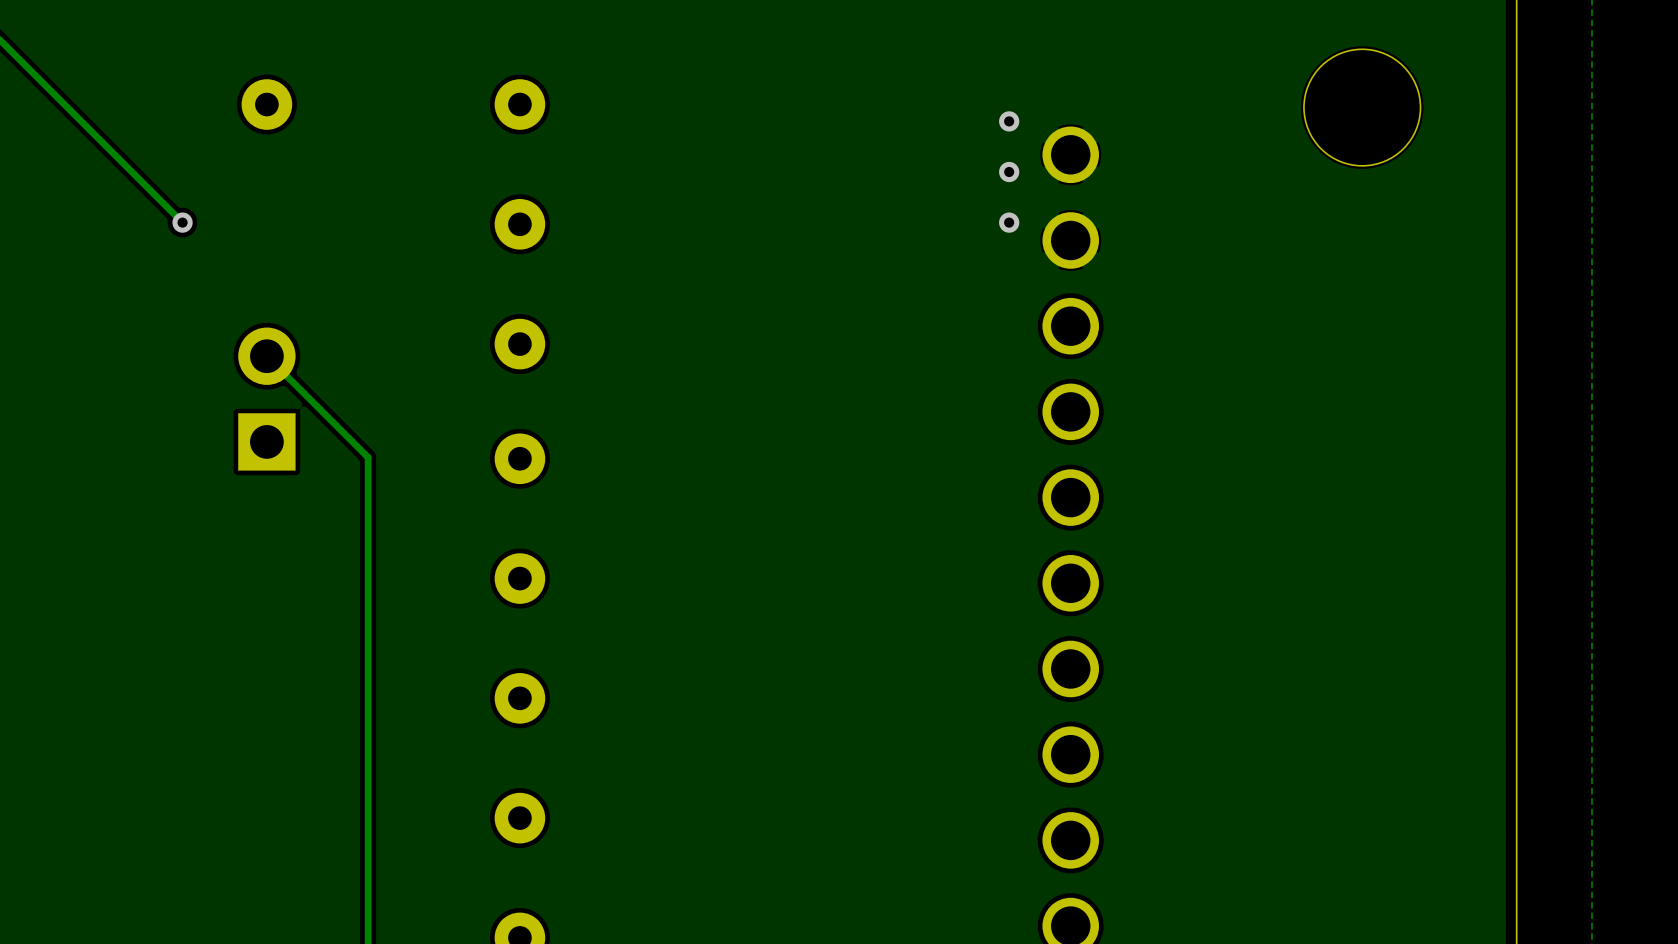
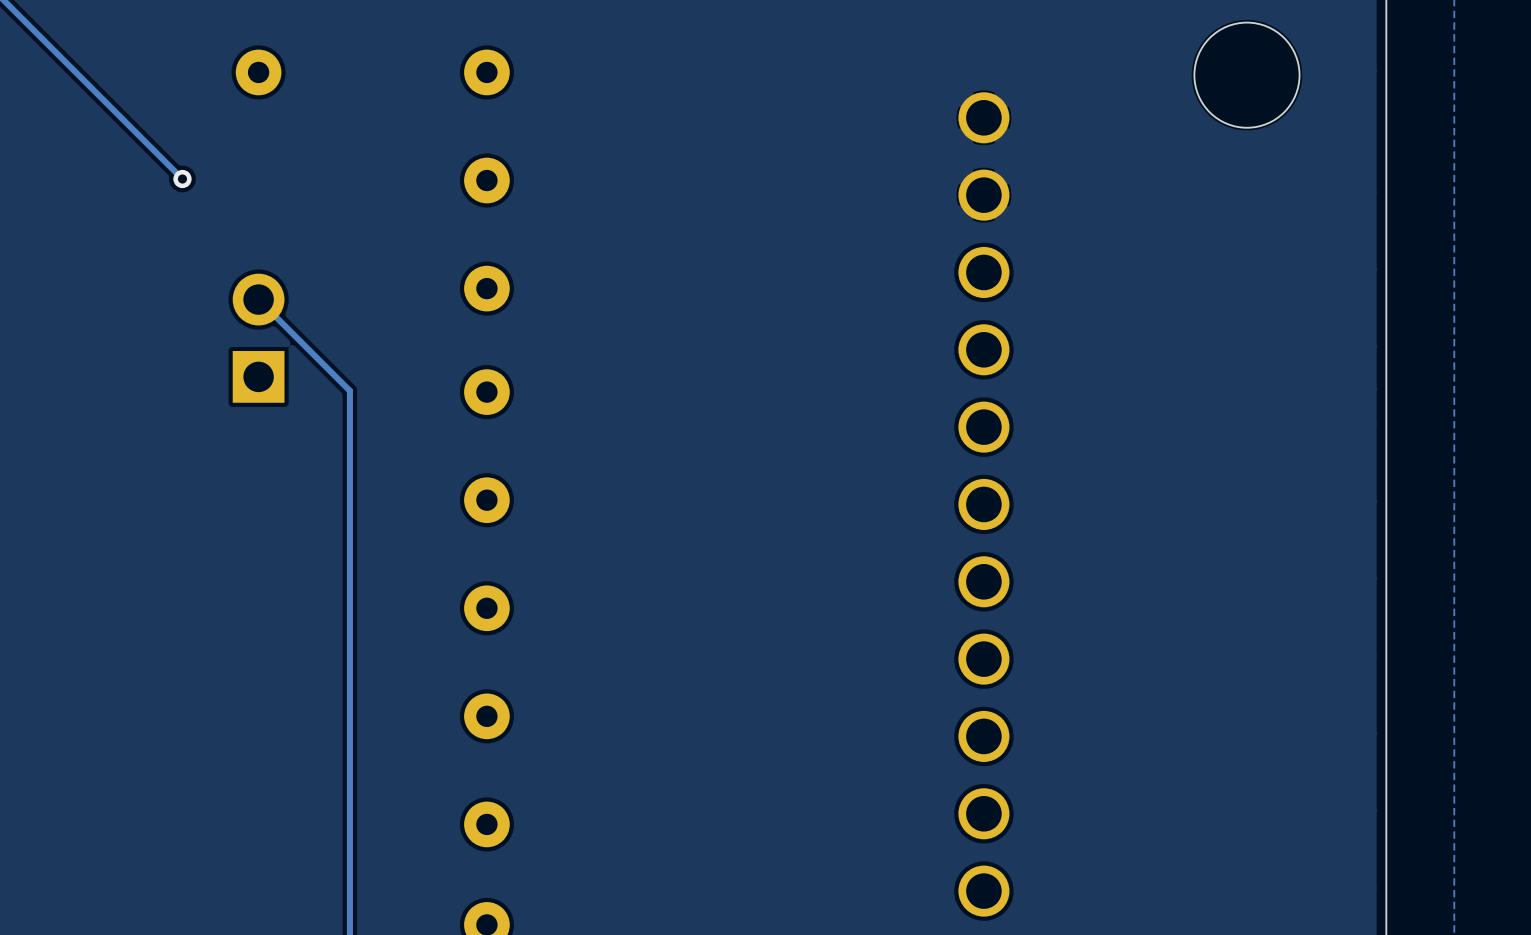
via: (1009, 121) -> none
via: (1009, 172) -> none
via: (1009, 222) -> none

